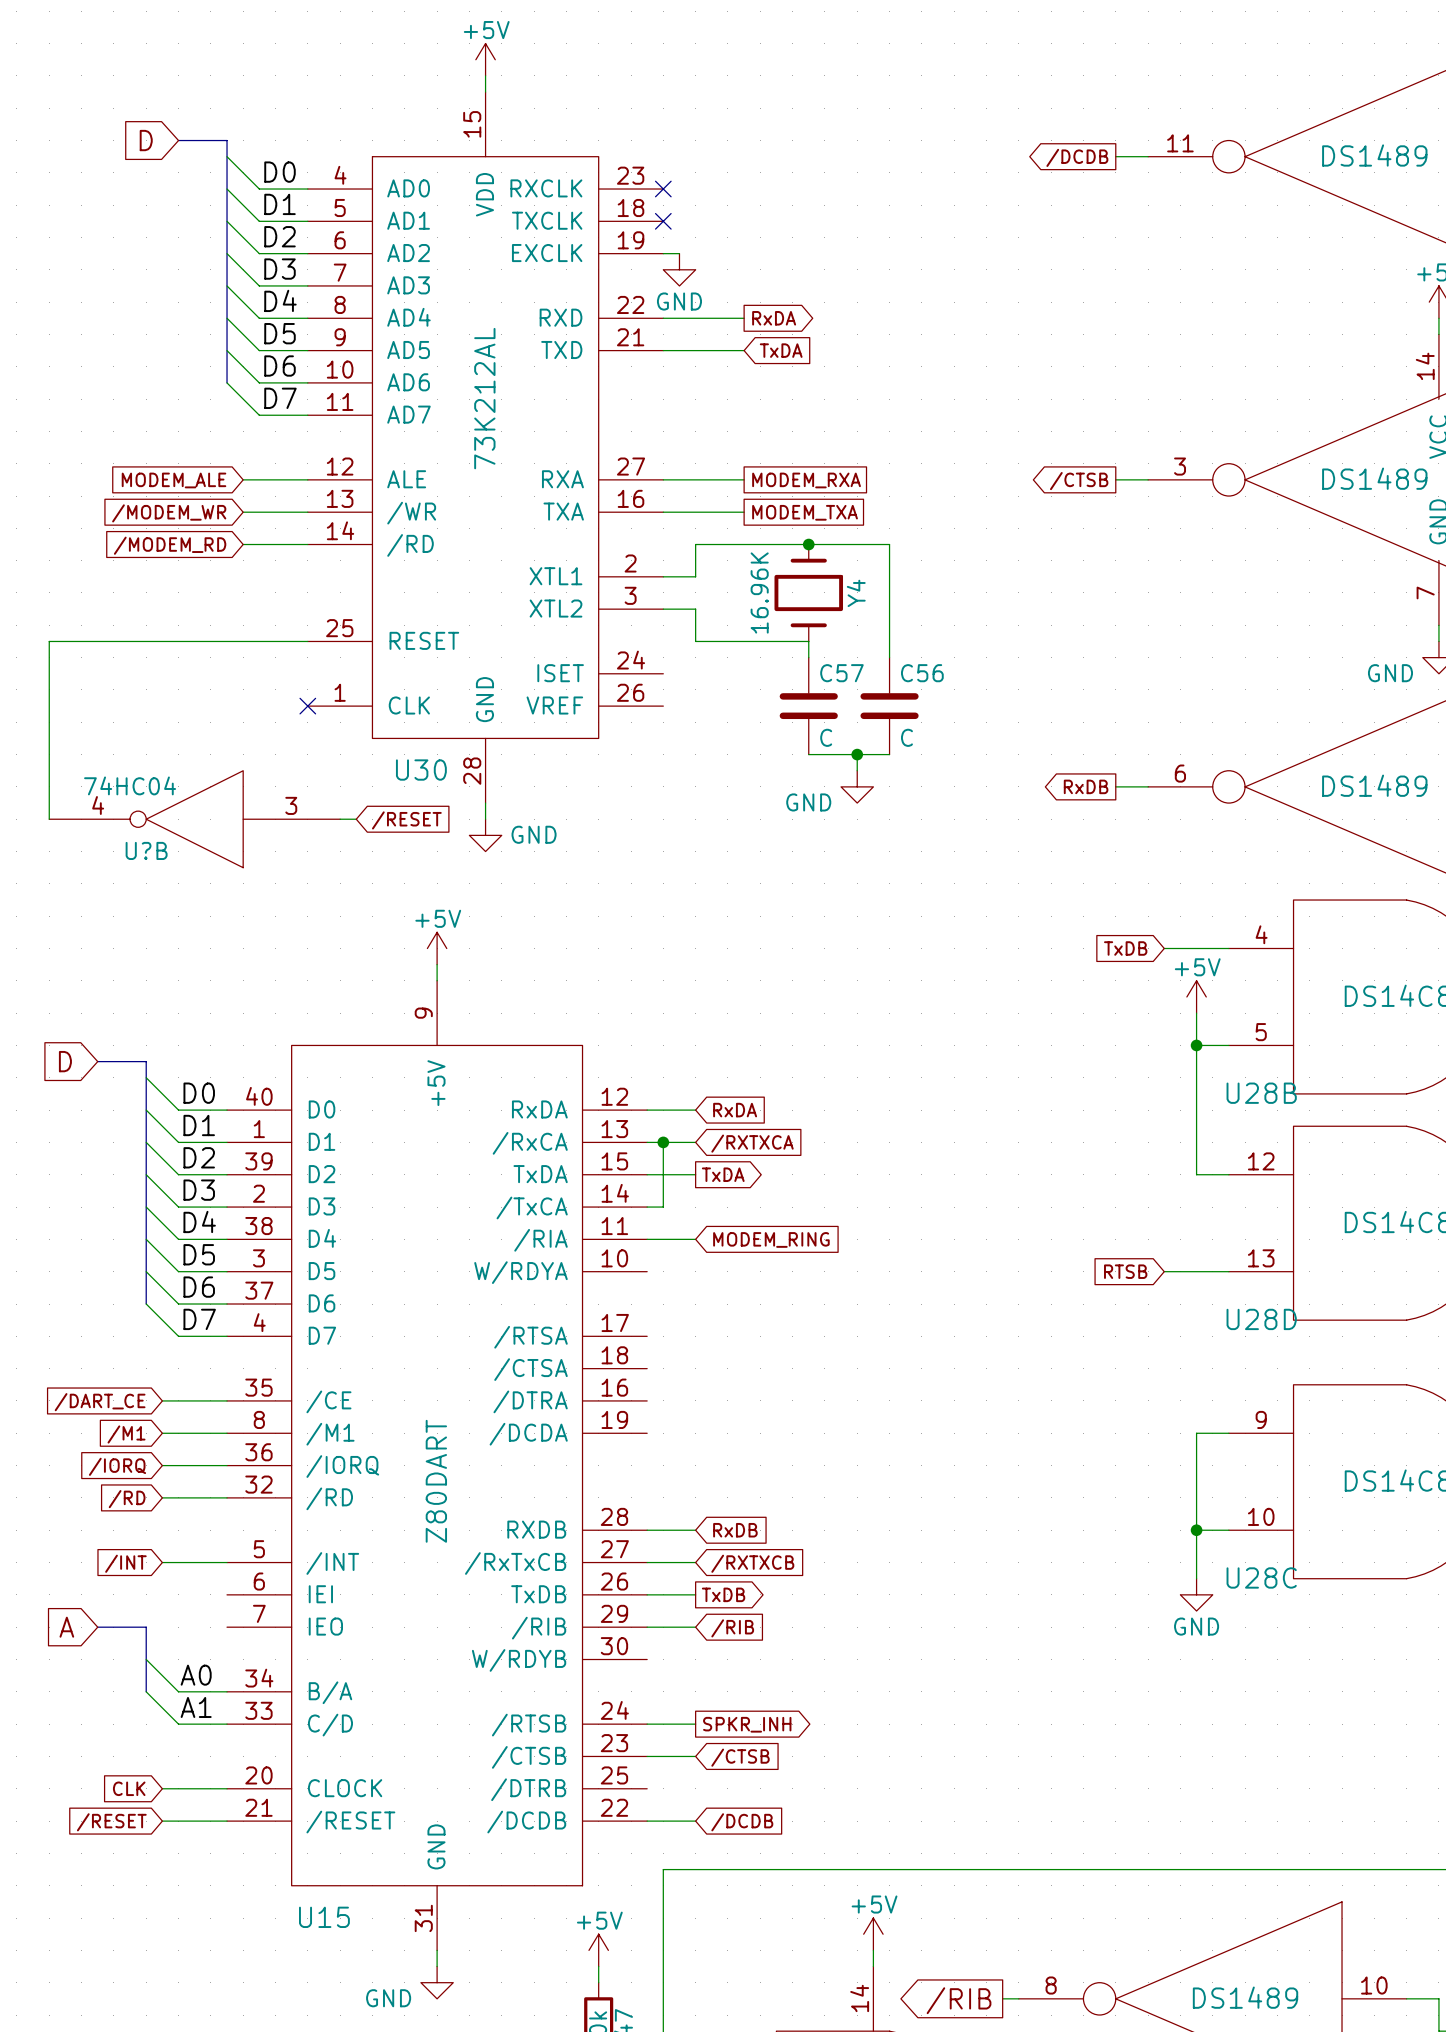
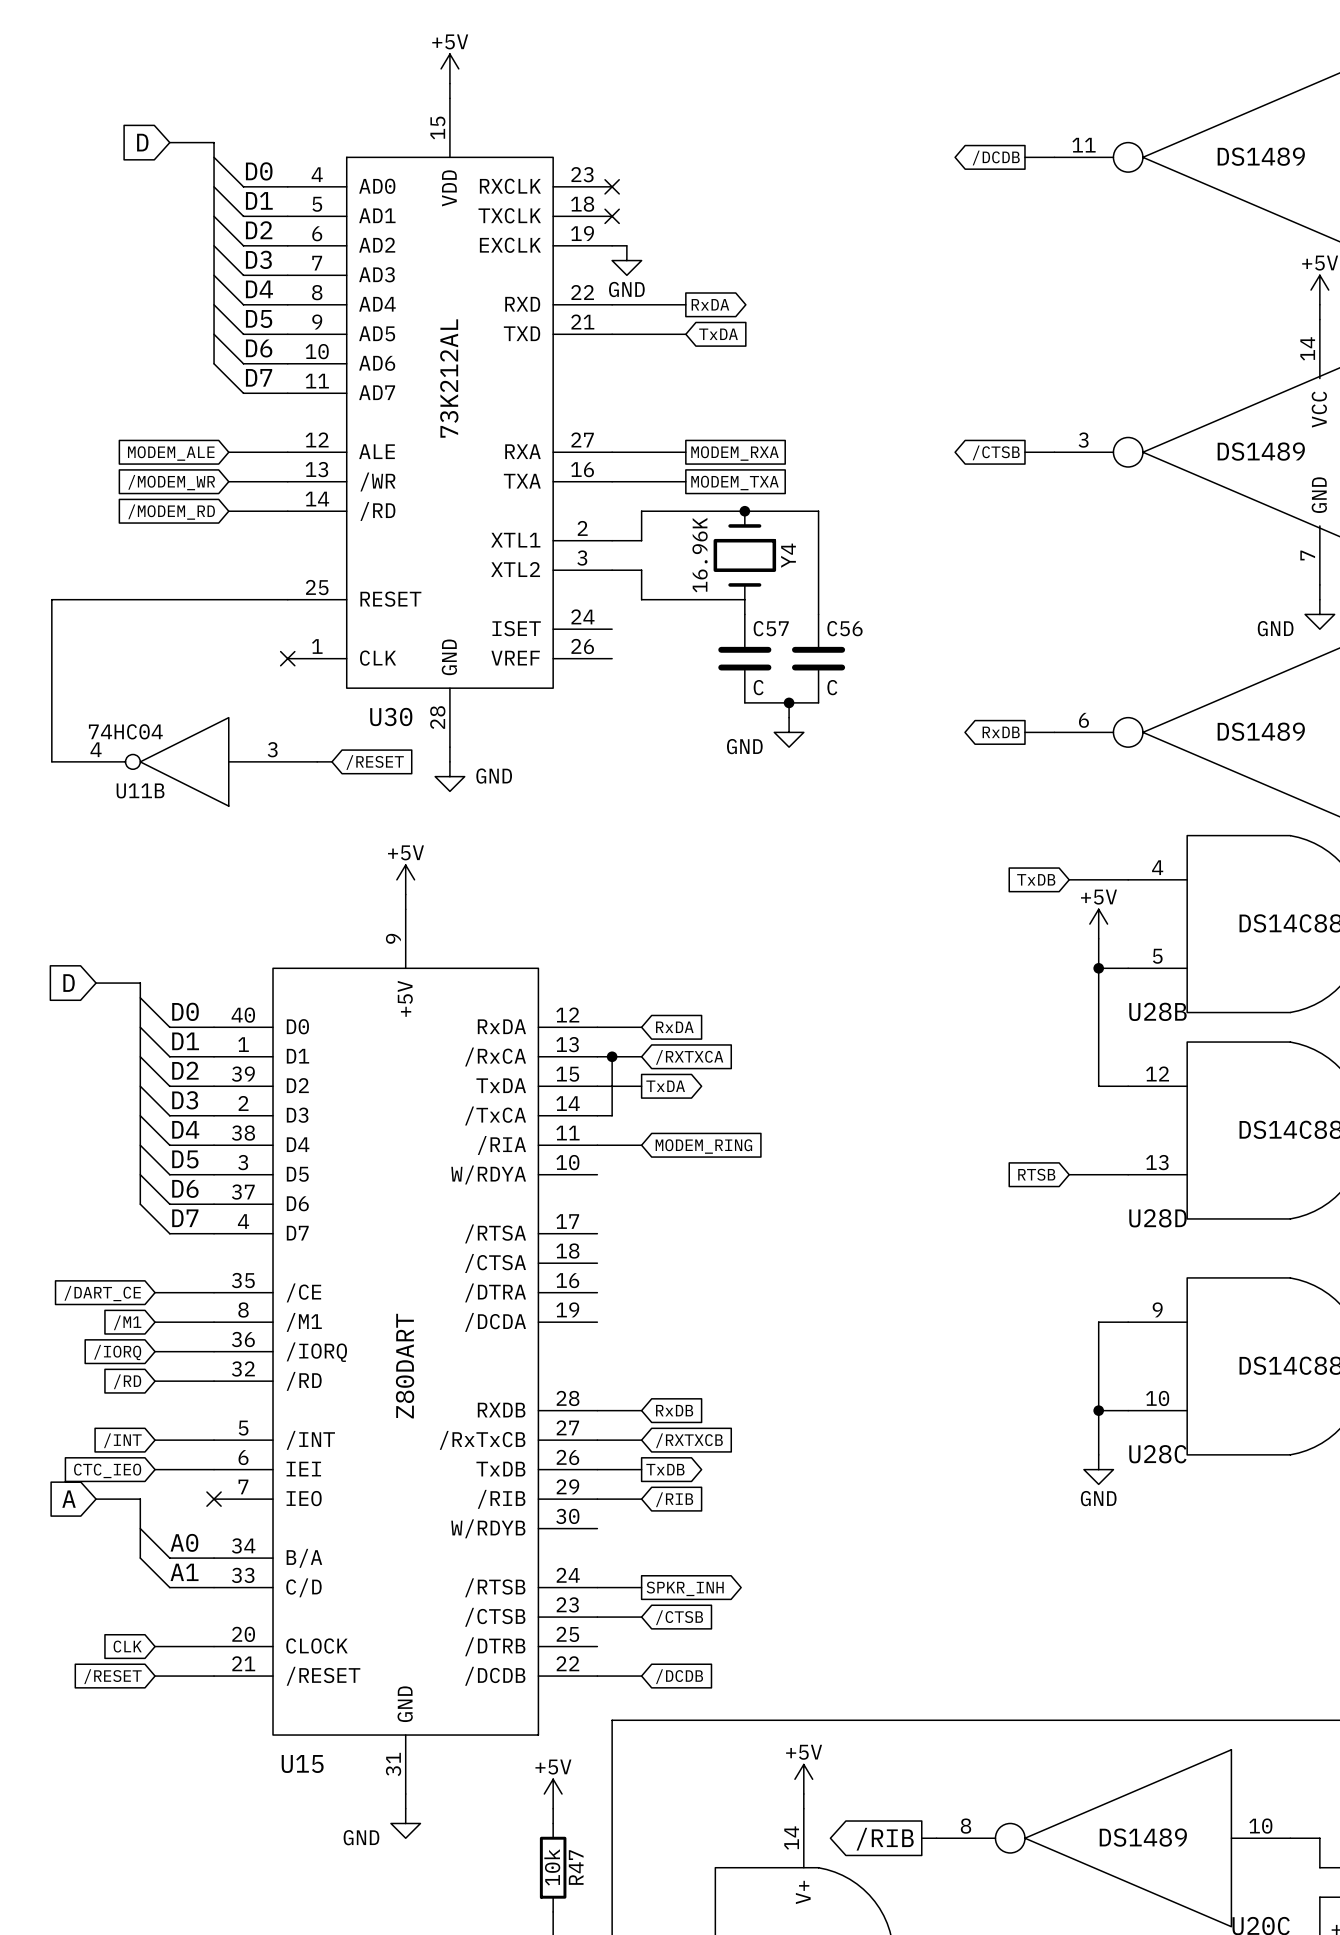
U?B name: U?B (146, 850) -> U11B (140, 790)
wire: none -> (155, 1469) (214, 1469)
global label: none -> CTC_IEO (107, 1470)
no-connect mark: none -> (214, 1499)

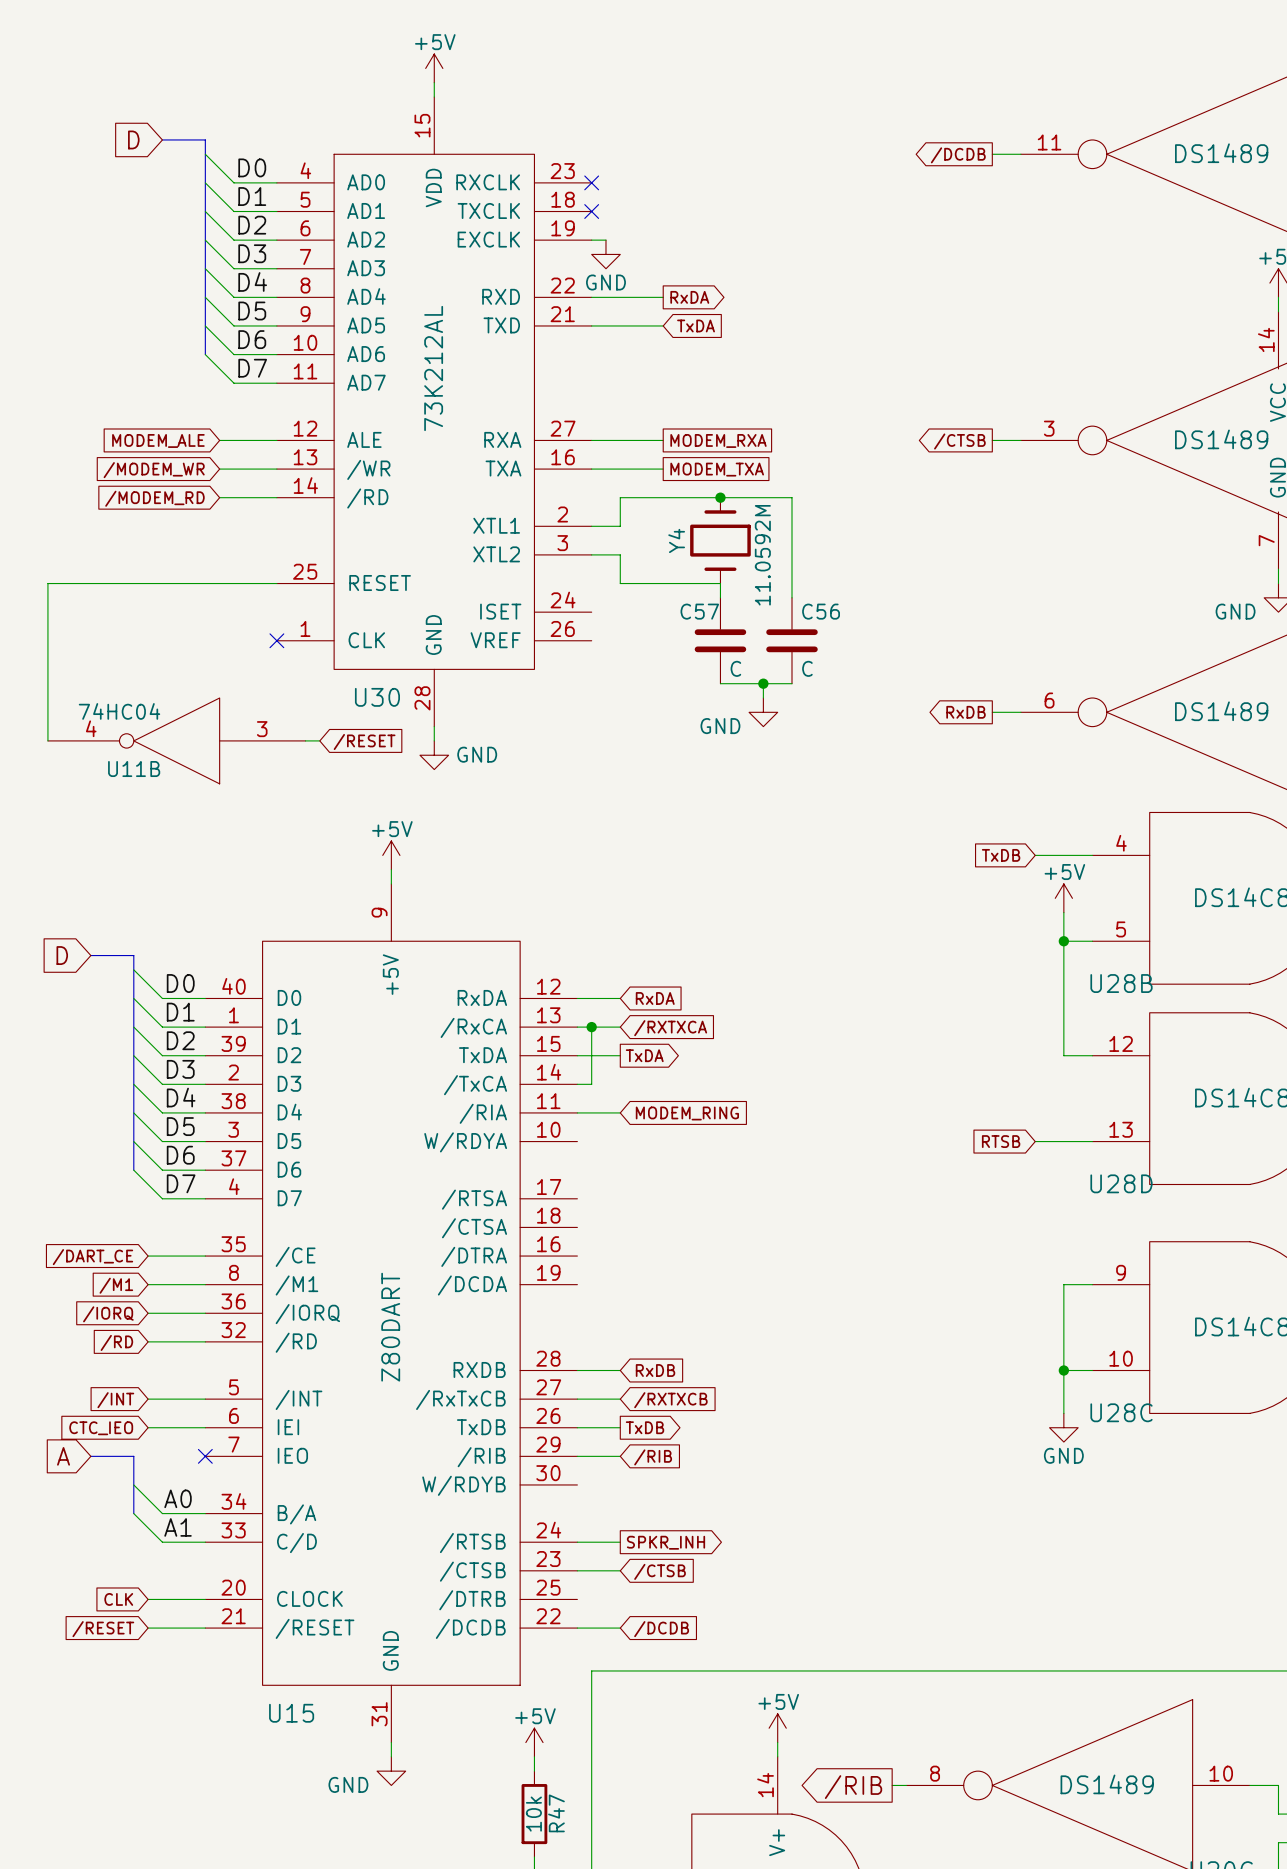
Y4 value: 16.96K (700, 555) -> 11.0592M (762, 555)
Y4 name position: Y4 (788, 555) -> Y4 (676, 540)
C57 name position: C57 (771, 628) -> C57 (699, 611)

